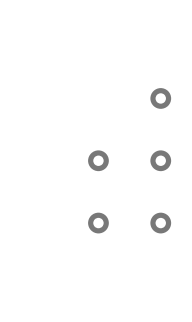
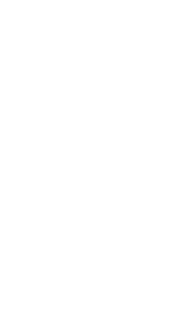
via: (160, 98) -> none
via: (98, 160) -> none
via: (160, 160) -> none
via: (98, 223) -> none
via: (160, 223) -> none

